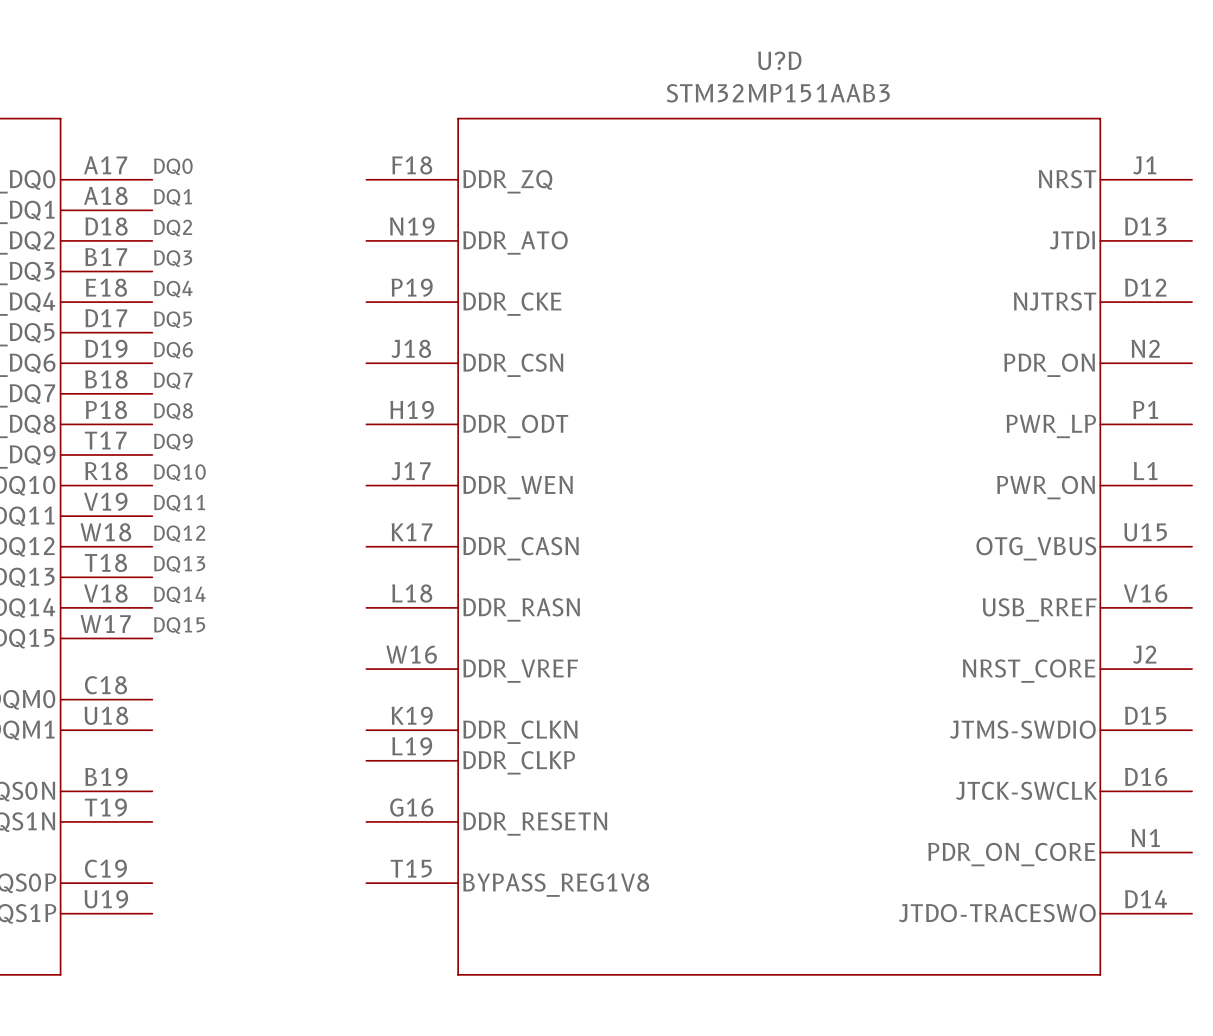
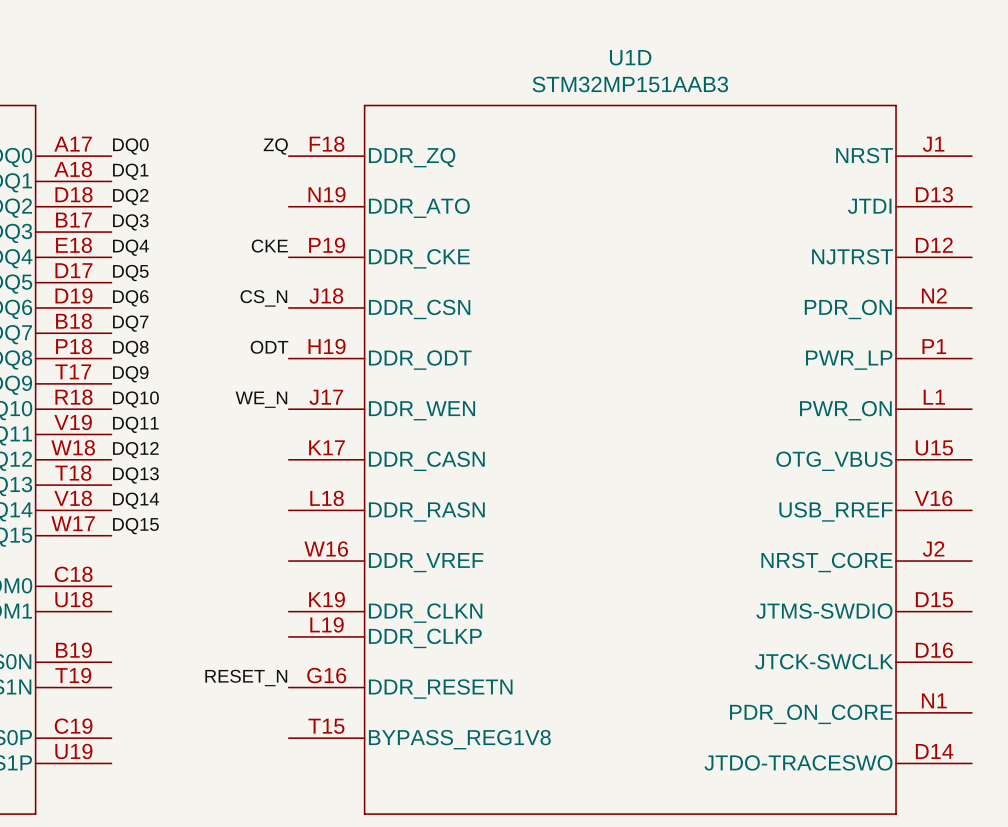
U?D name: U?D (779, 60) -> U1D (630, 57)
label: none -> ZQ (275, 146)
label: none -> CKE (269, 246)
label: none -> CS_N (263, 298)
label: none -> ODT (269, 347)
label: none -> WE_N (261, 399)
label: none -> RESET_N (246, 677)

